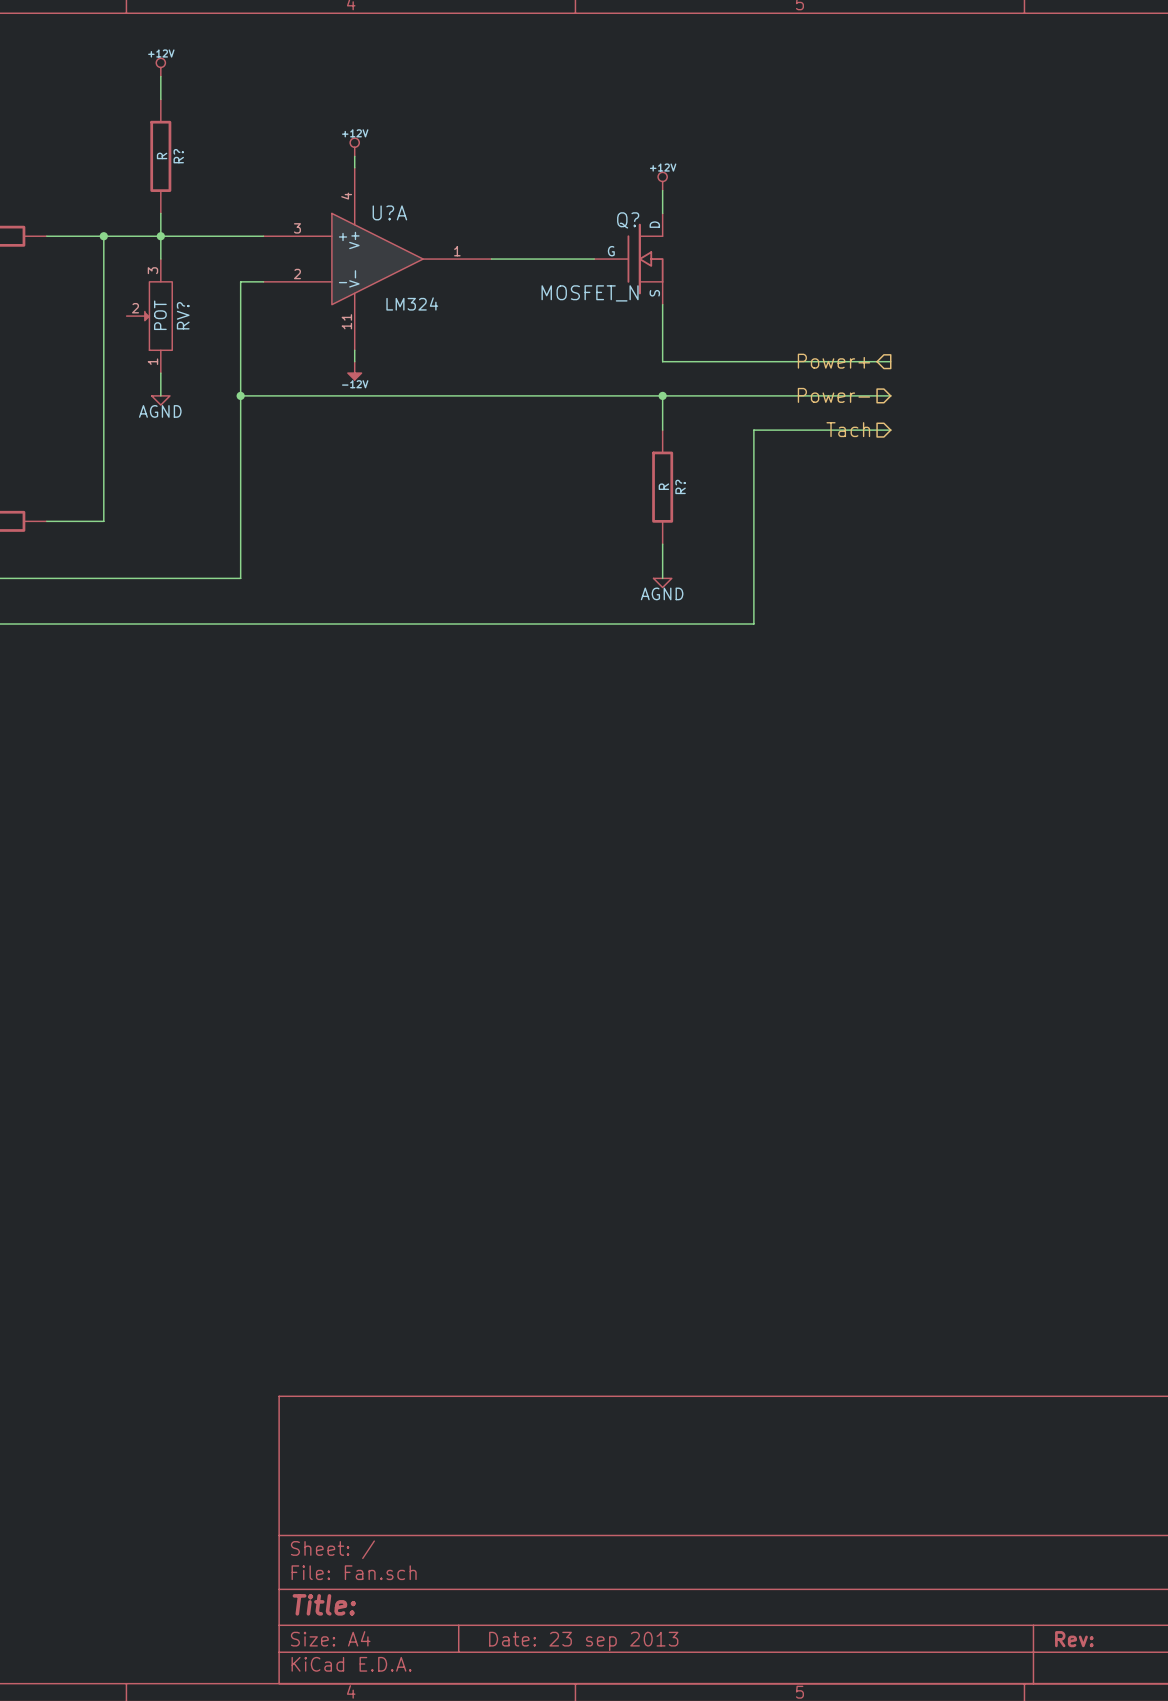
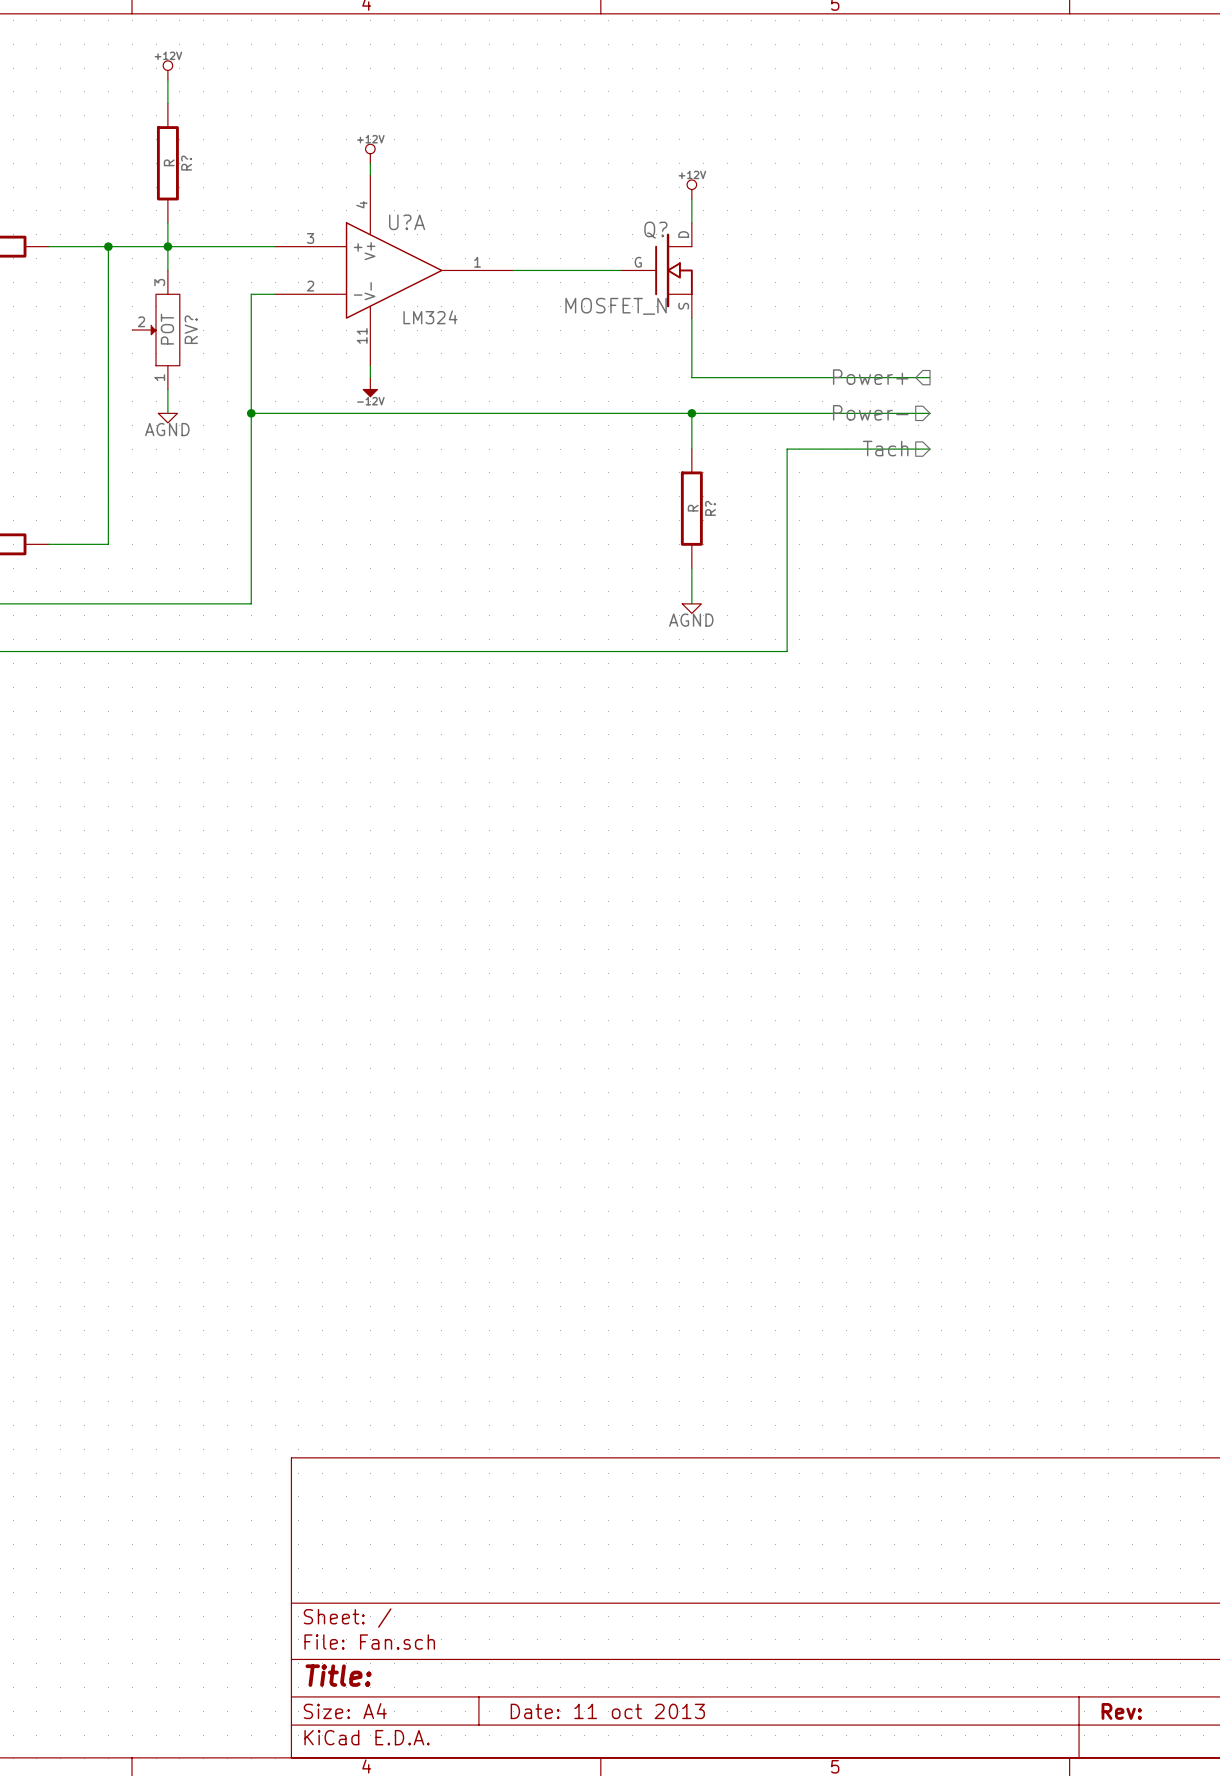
title block: Date: 23 sep 2013 (583, 1641) -> Date: 11 oct 2013 (607, 1711)

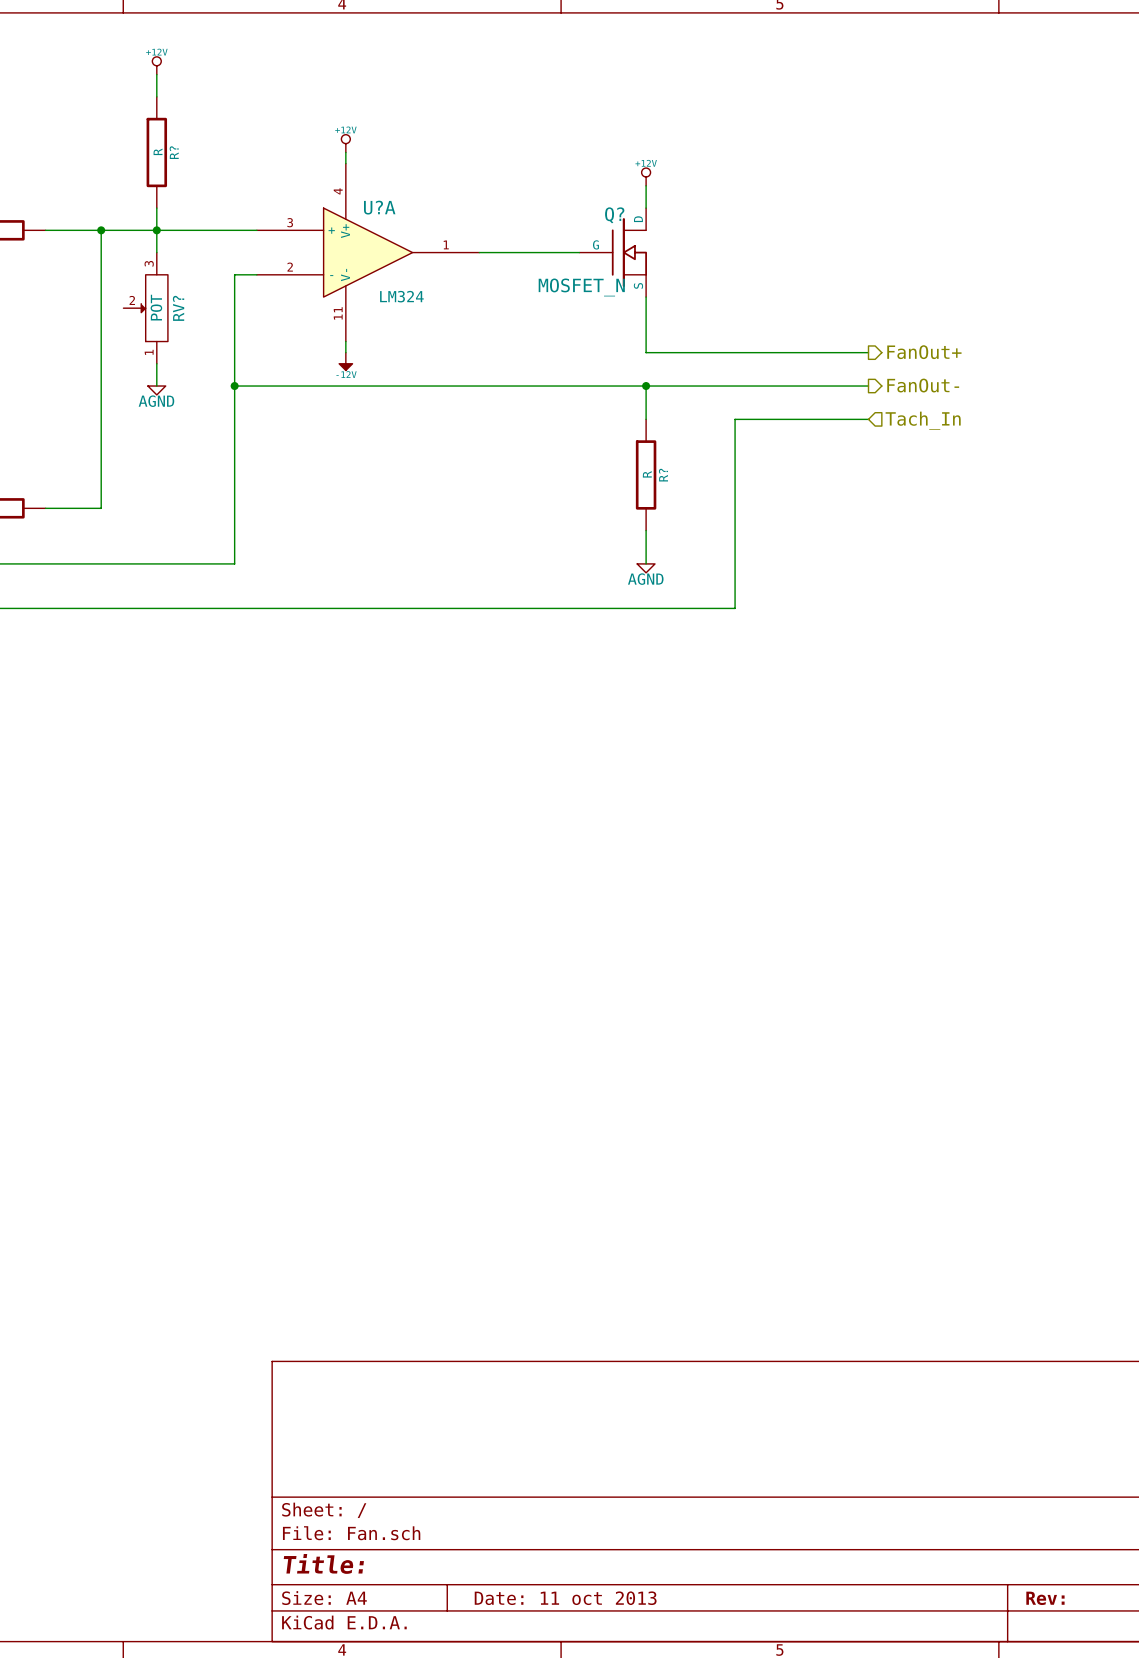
hierarchical label: Power+ (870, 377) -> none
hierarchical label: none -> FanOut+ (924, 352)
hierarchical label: Power- (870, 412) -> none
hierarchical label: none -> FanOut- (923, 385)
hierarchical label: Tach (885, 448) -> none
hierarchical label: none -> Tach_In (923, 420)

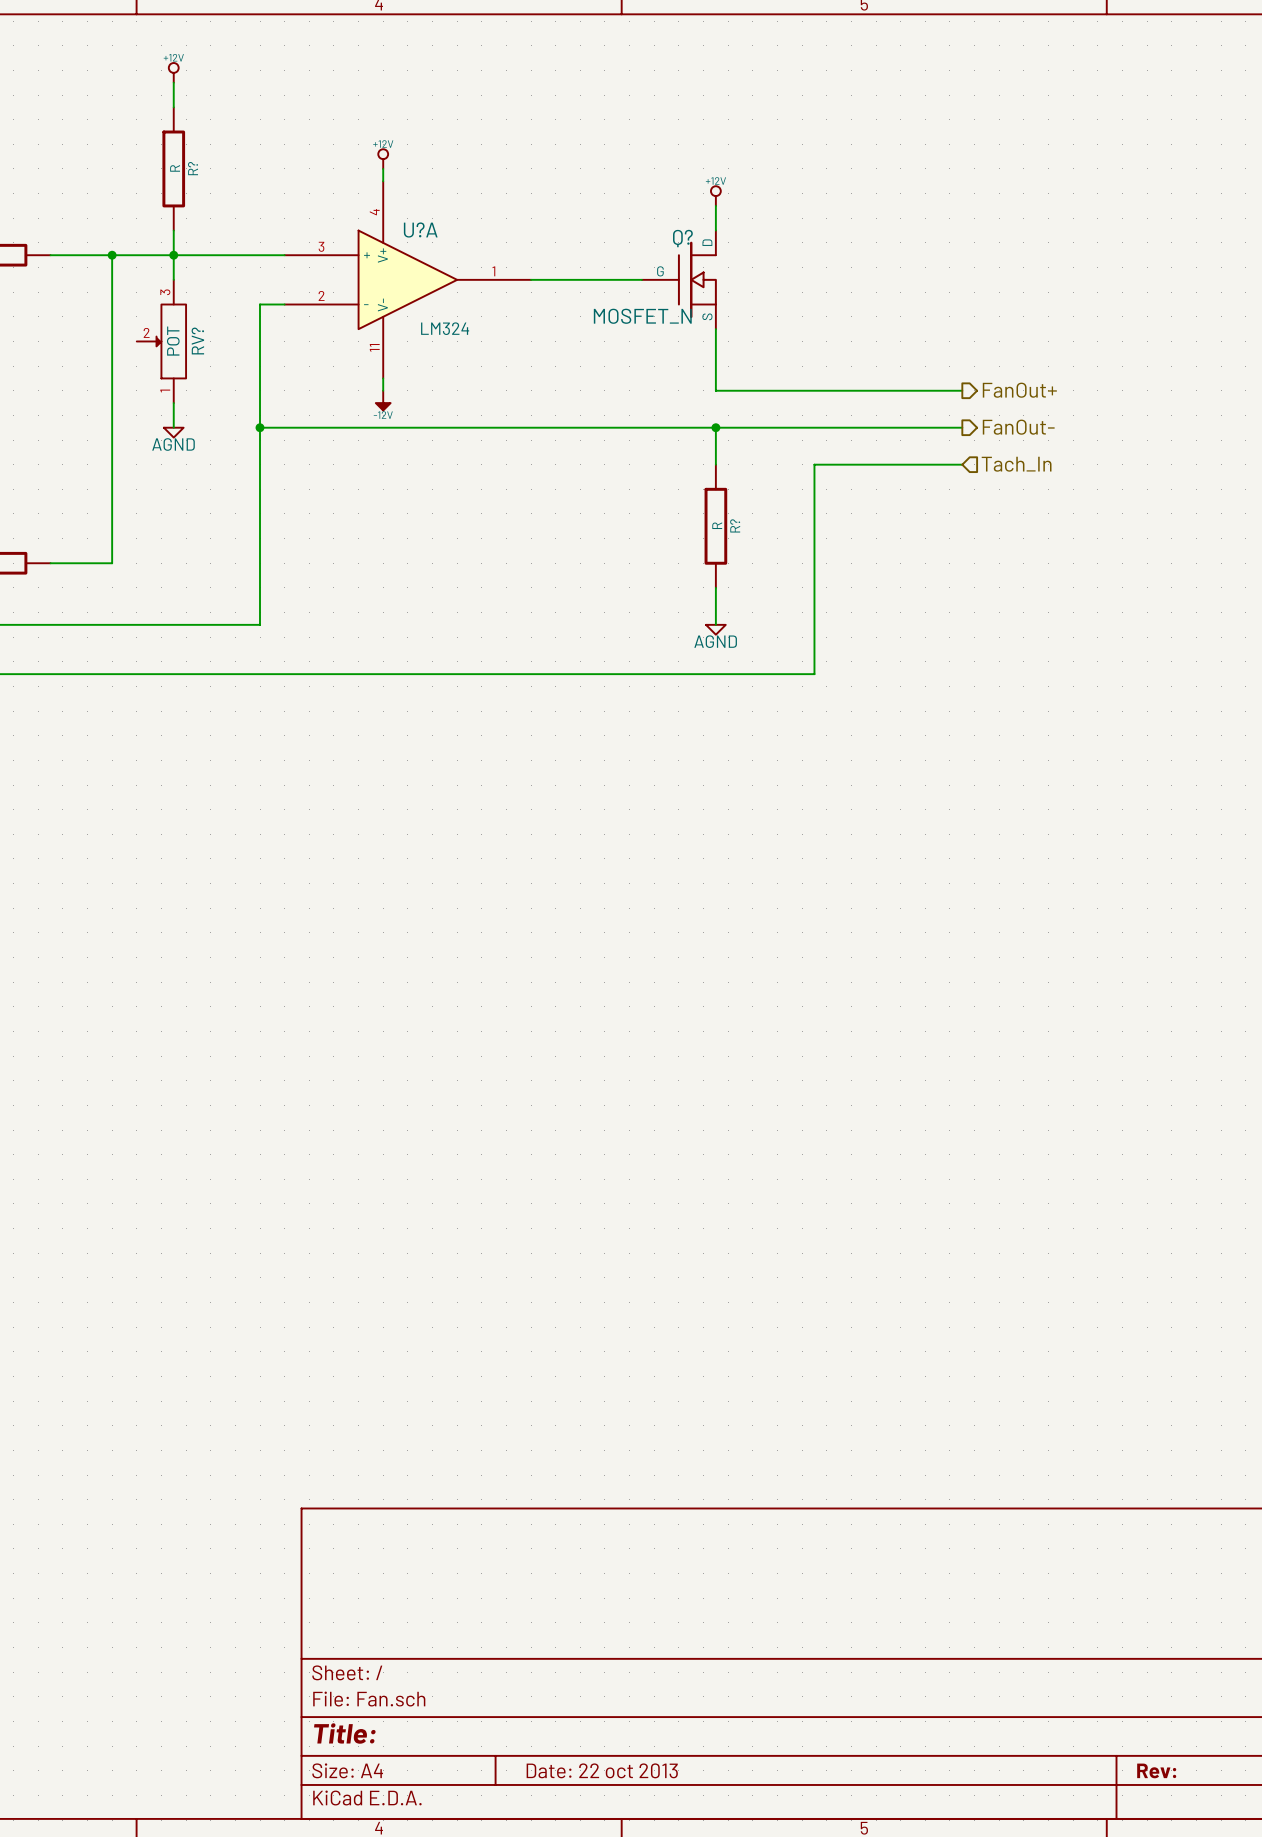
title block: Date: 11 oct 2013 (565, 1598) -> Date: 22 oct 2013 (602, 1770)

